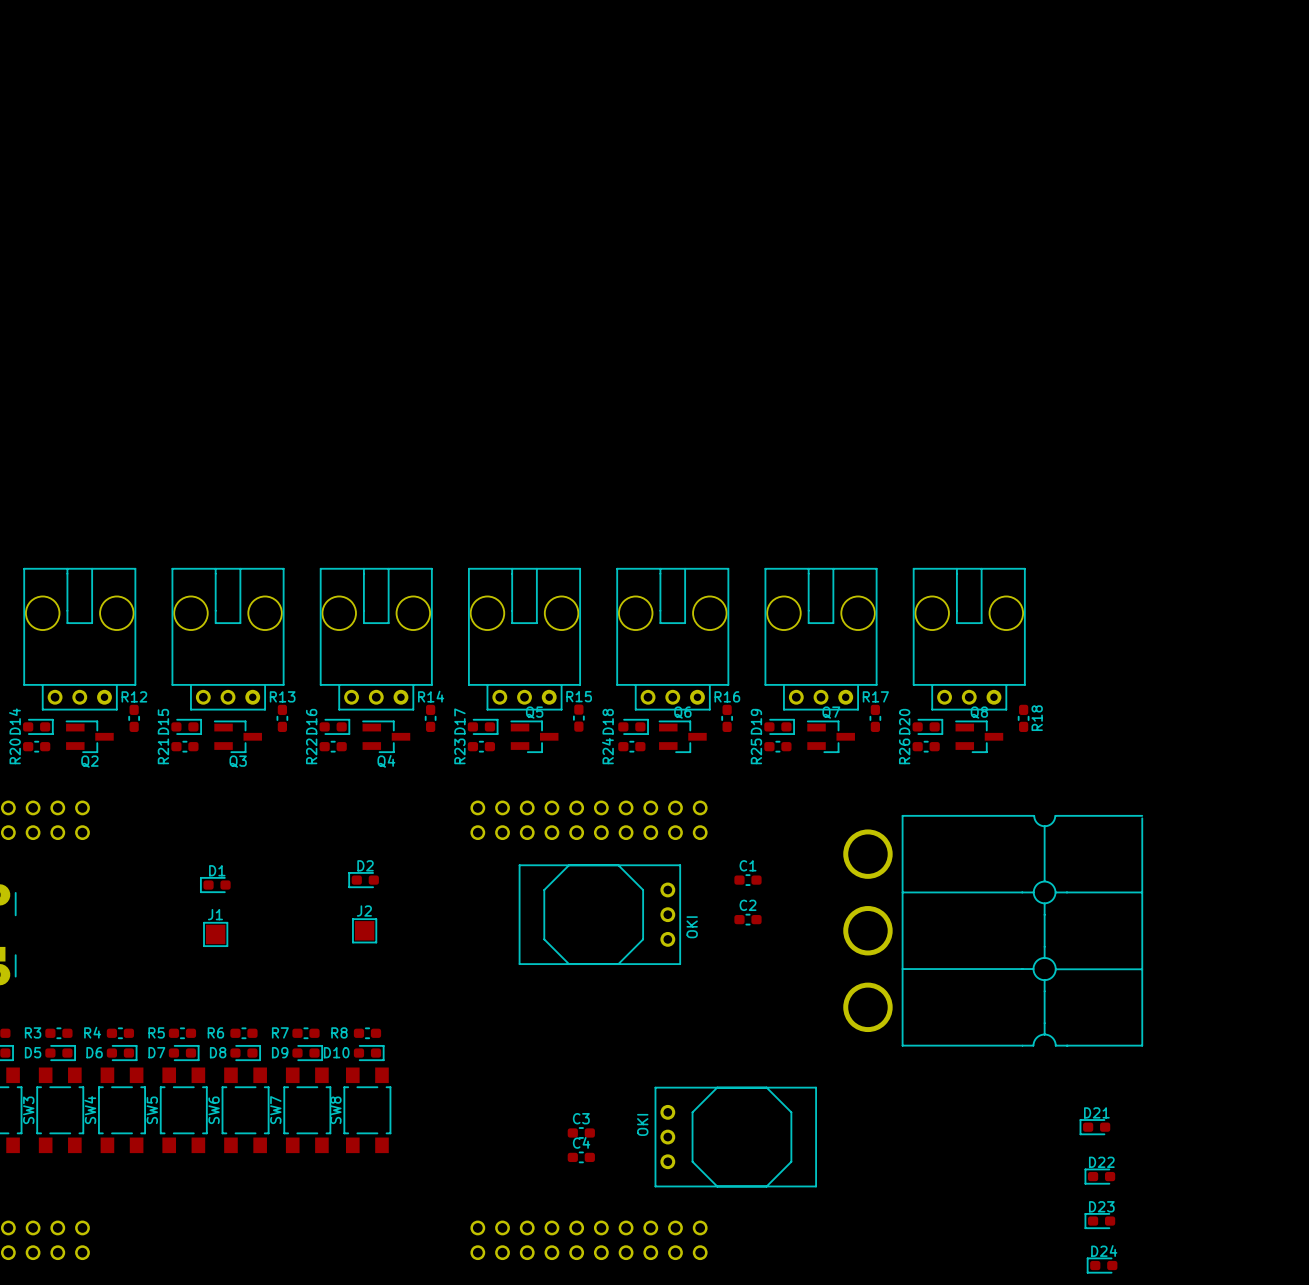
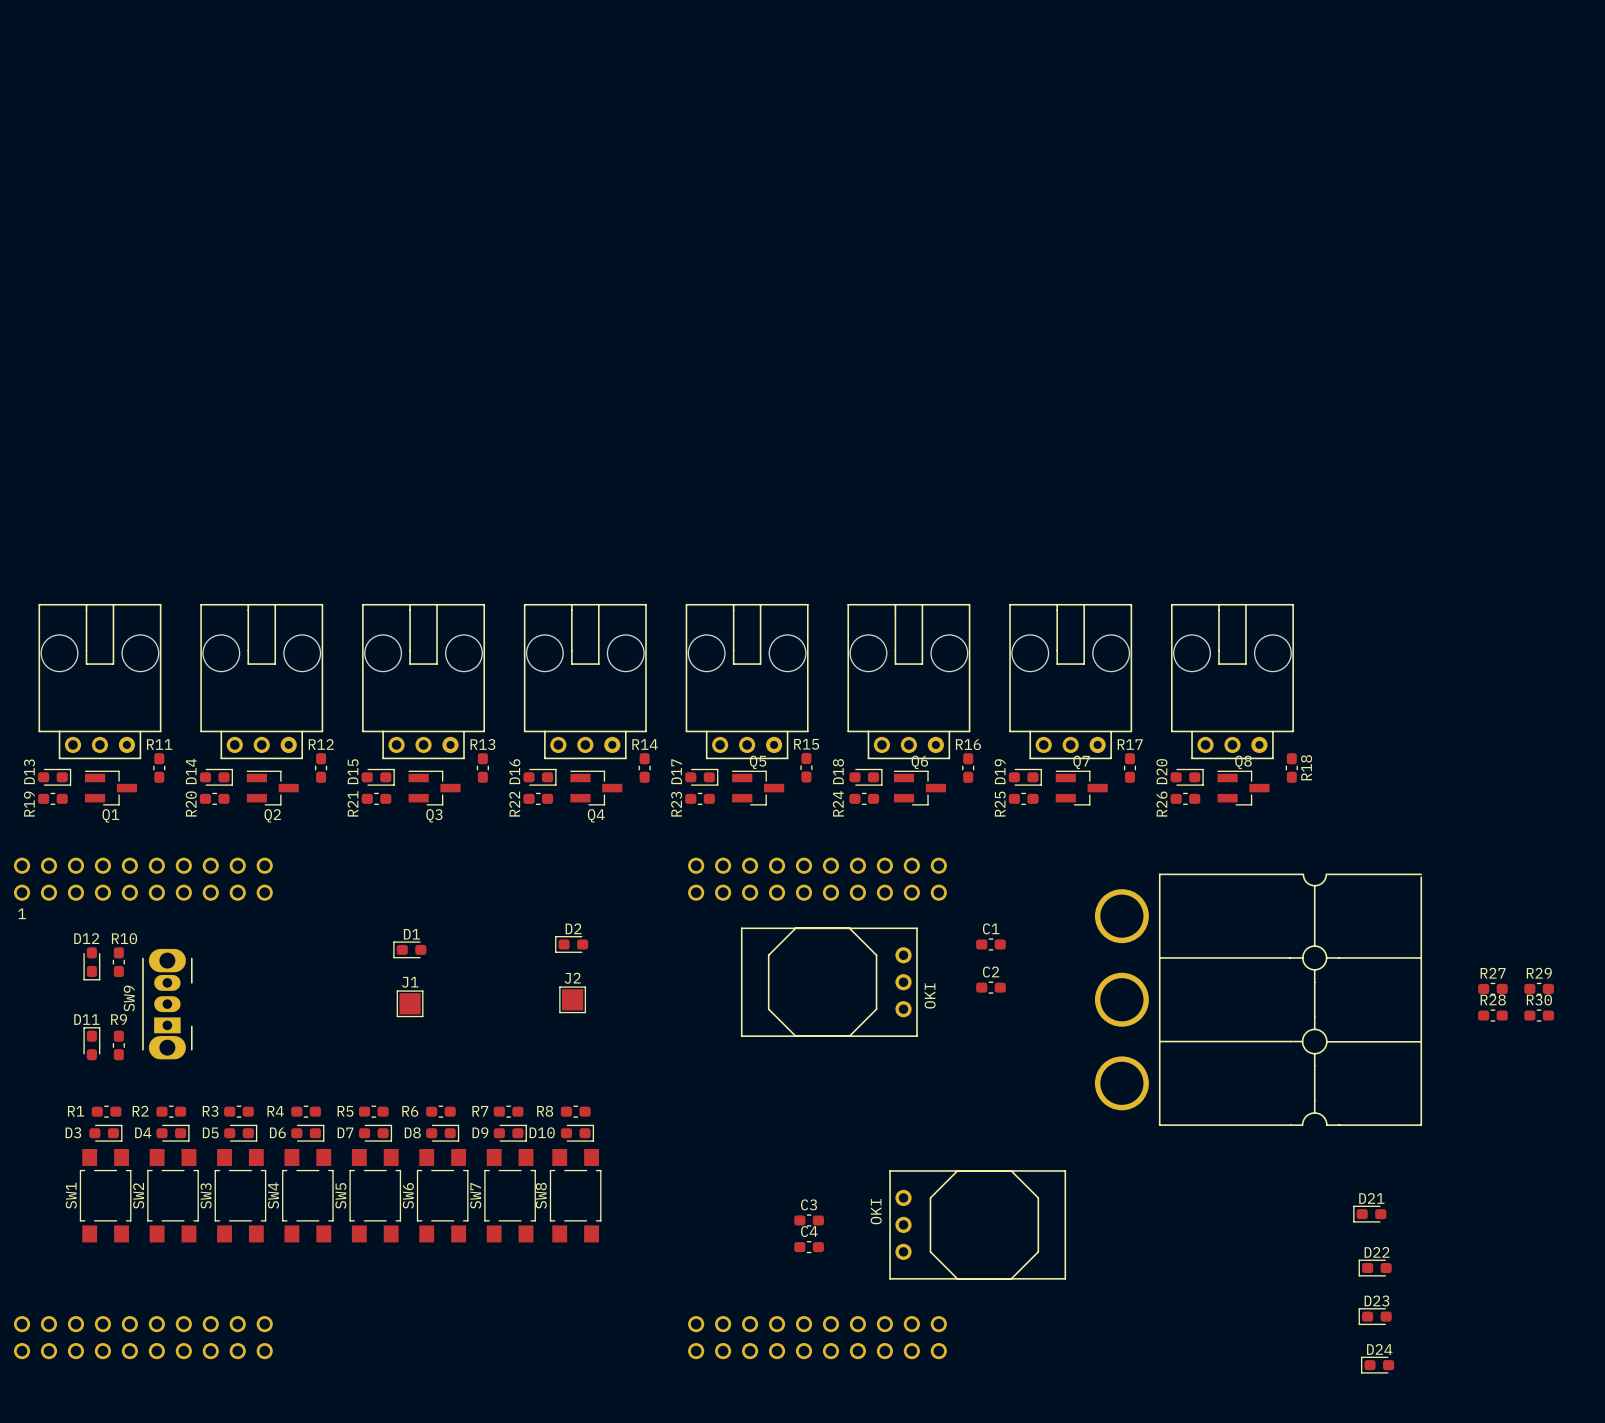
R27: none -> (1492, 988)
R29: none -> (1539, 988)
R28: none -> (1492, 1015)
R30: none -> (1539, 1015)

